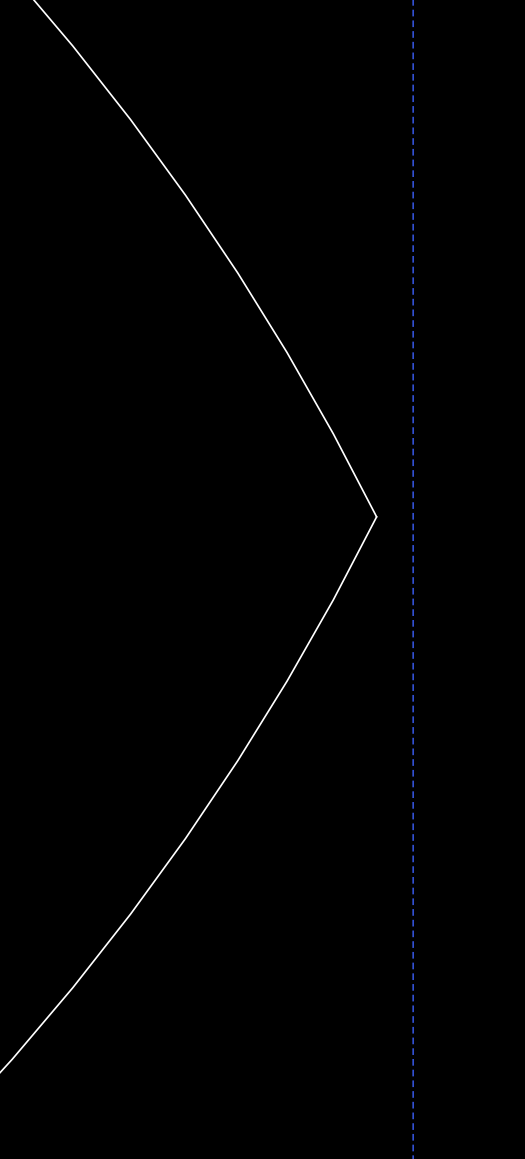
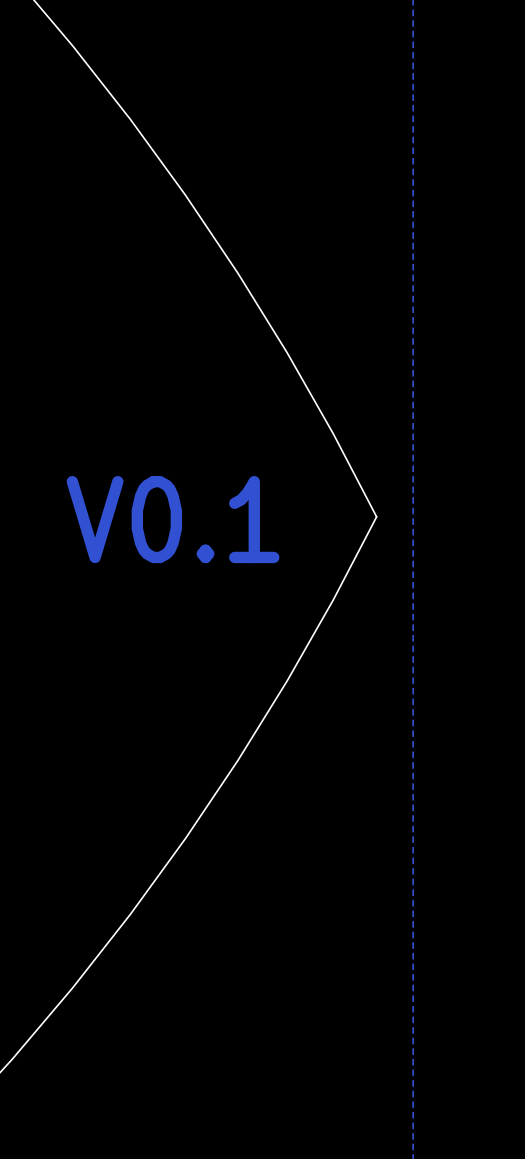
text: none -> V0.1 (173, 519)

